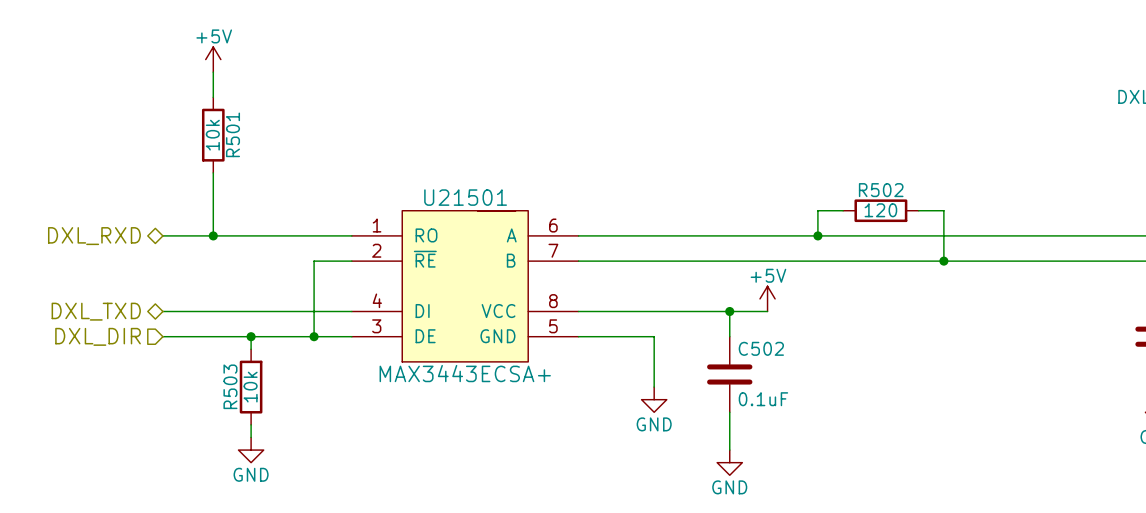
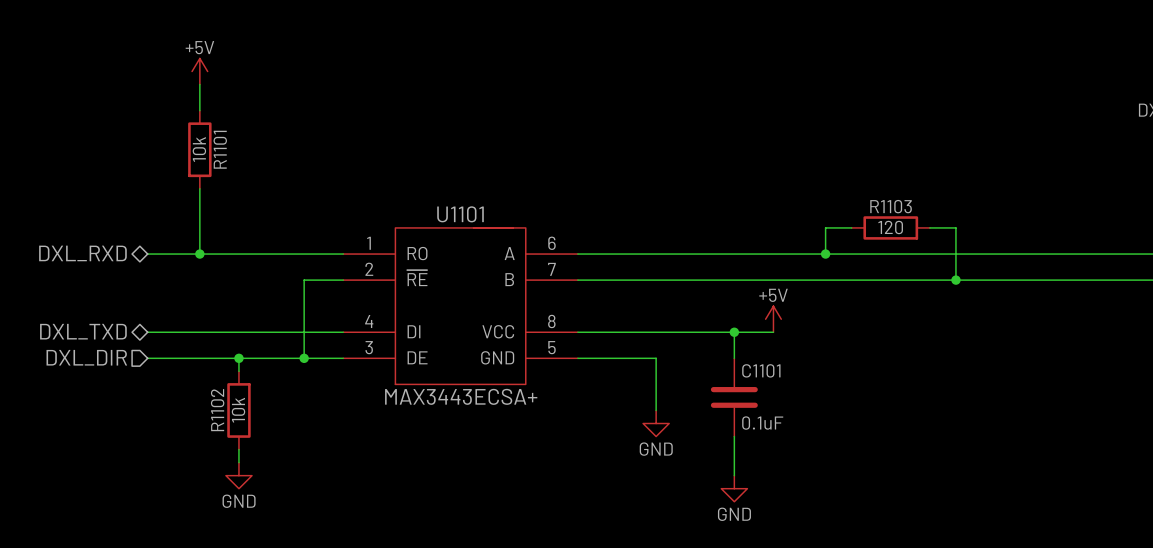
R501 name: R501 (232, 134) -> R1101 (220, 149)
R502 name: R502 (881, 190) -> R1103 (891, 206)
U21501 name: U21501 (465, 197) -> U1101 (460, 214)
C502 name: C502 (761, 348) -> C1101 (761, 370)
R503 name: R503 (230, 386) -> R1102 (217, 410)

